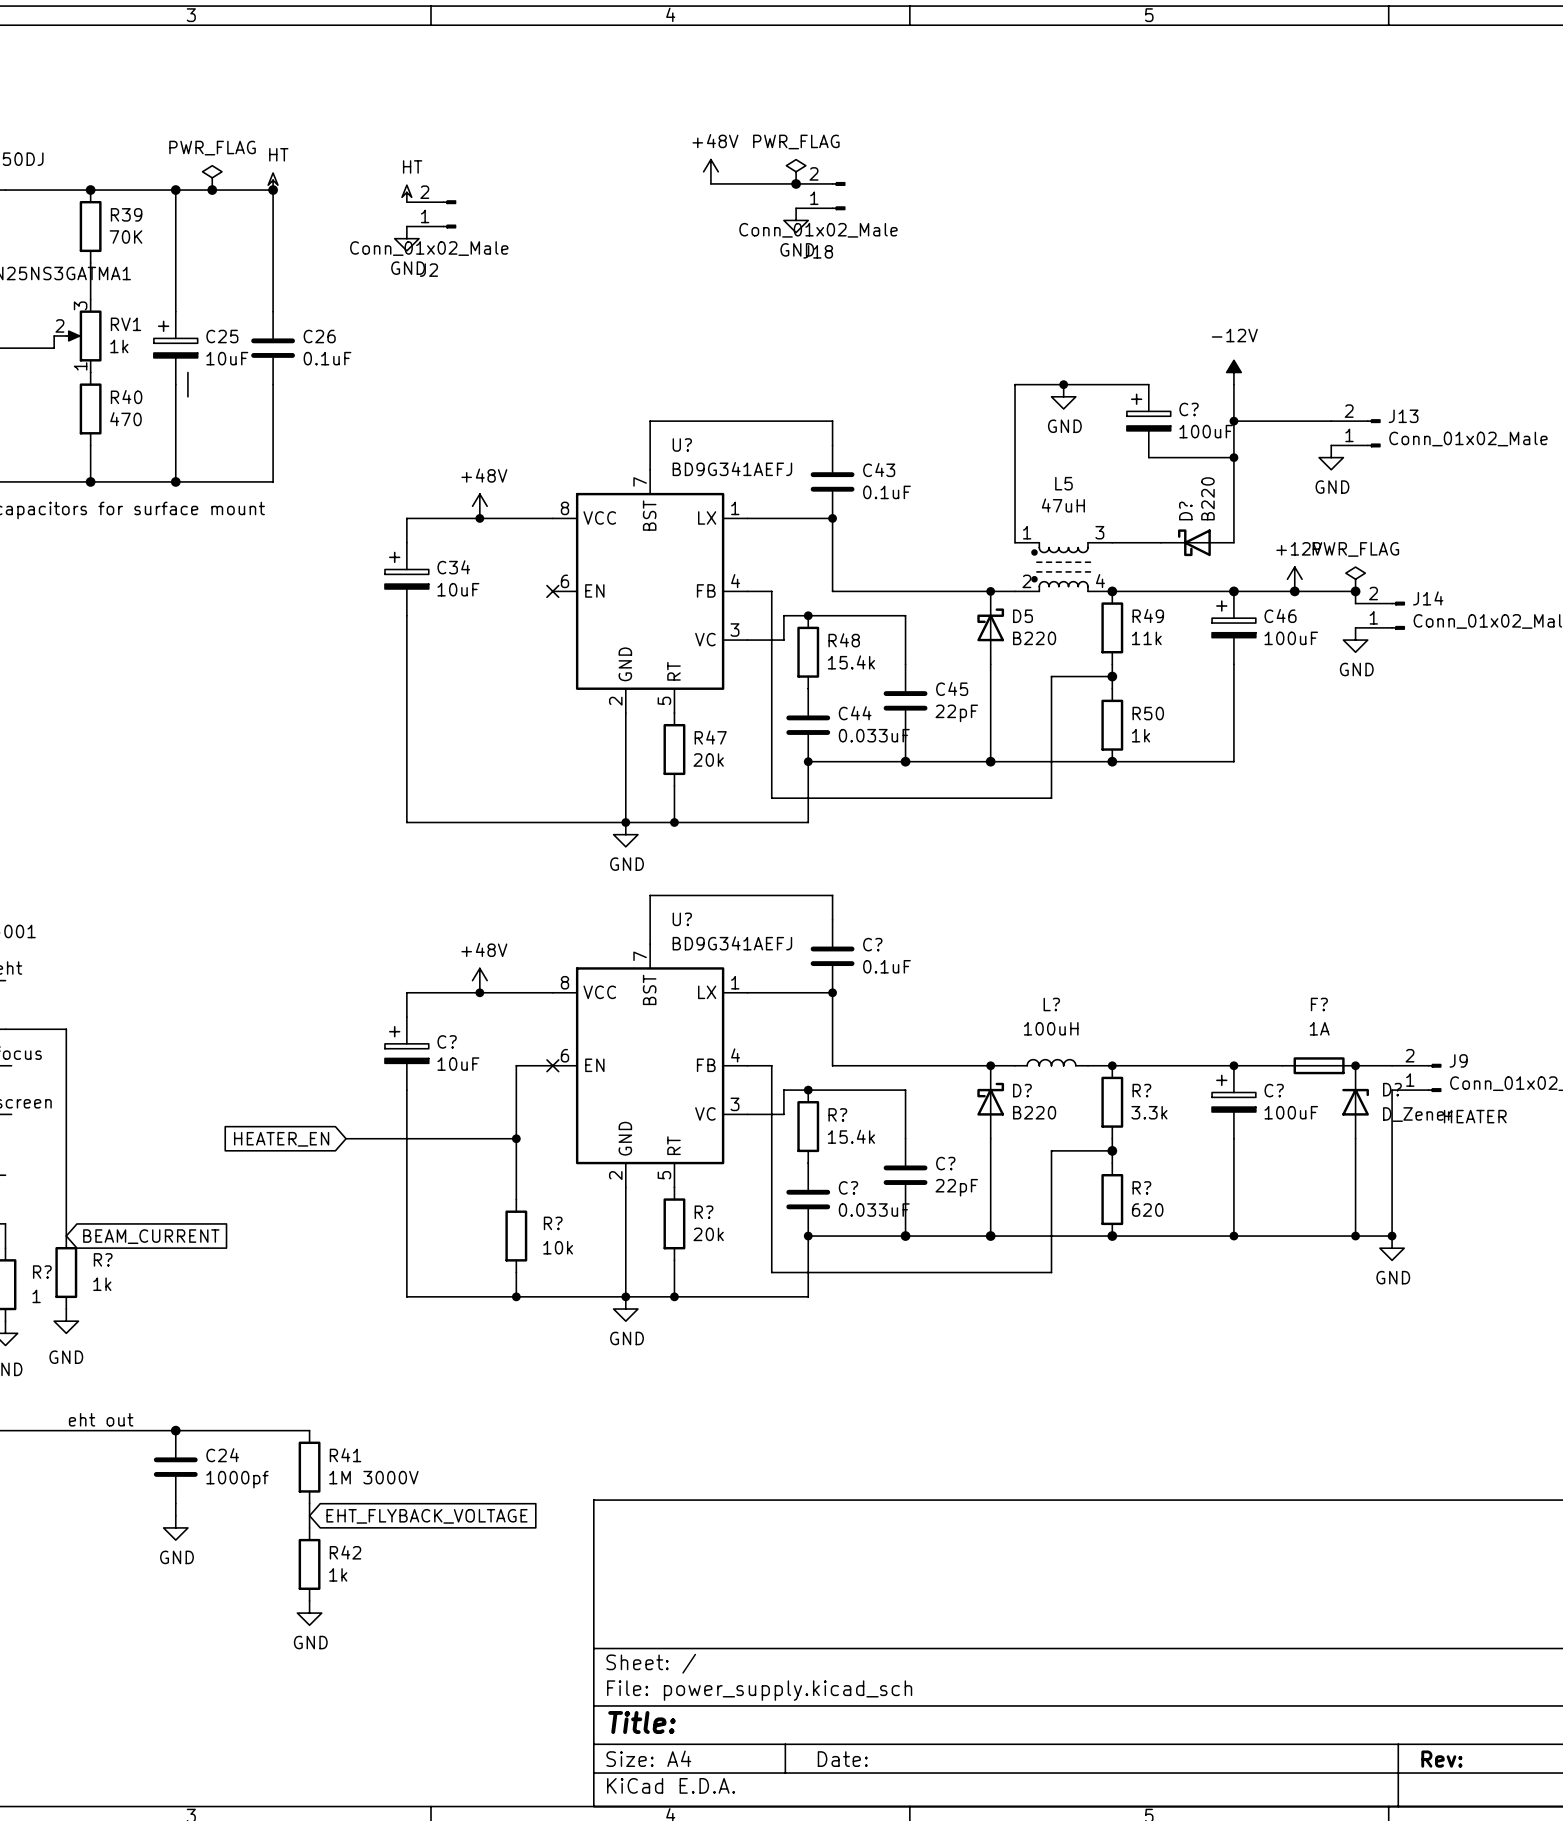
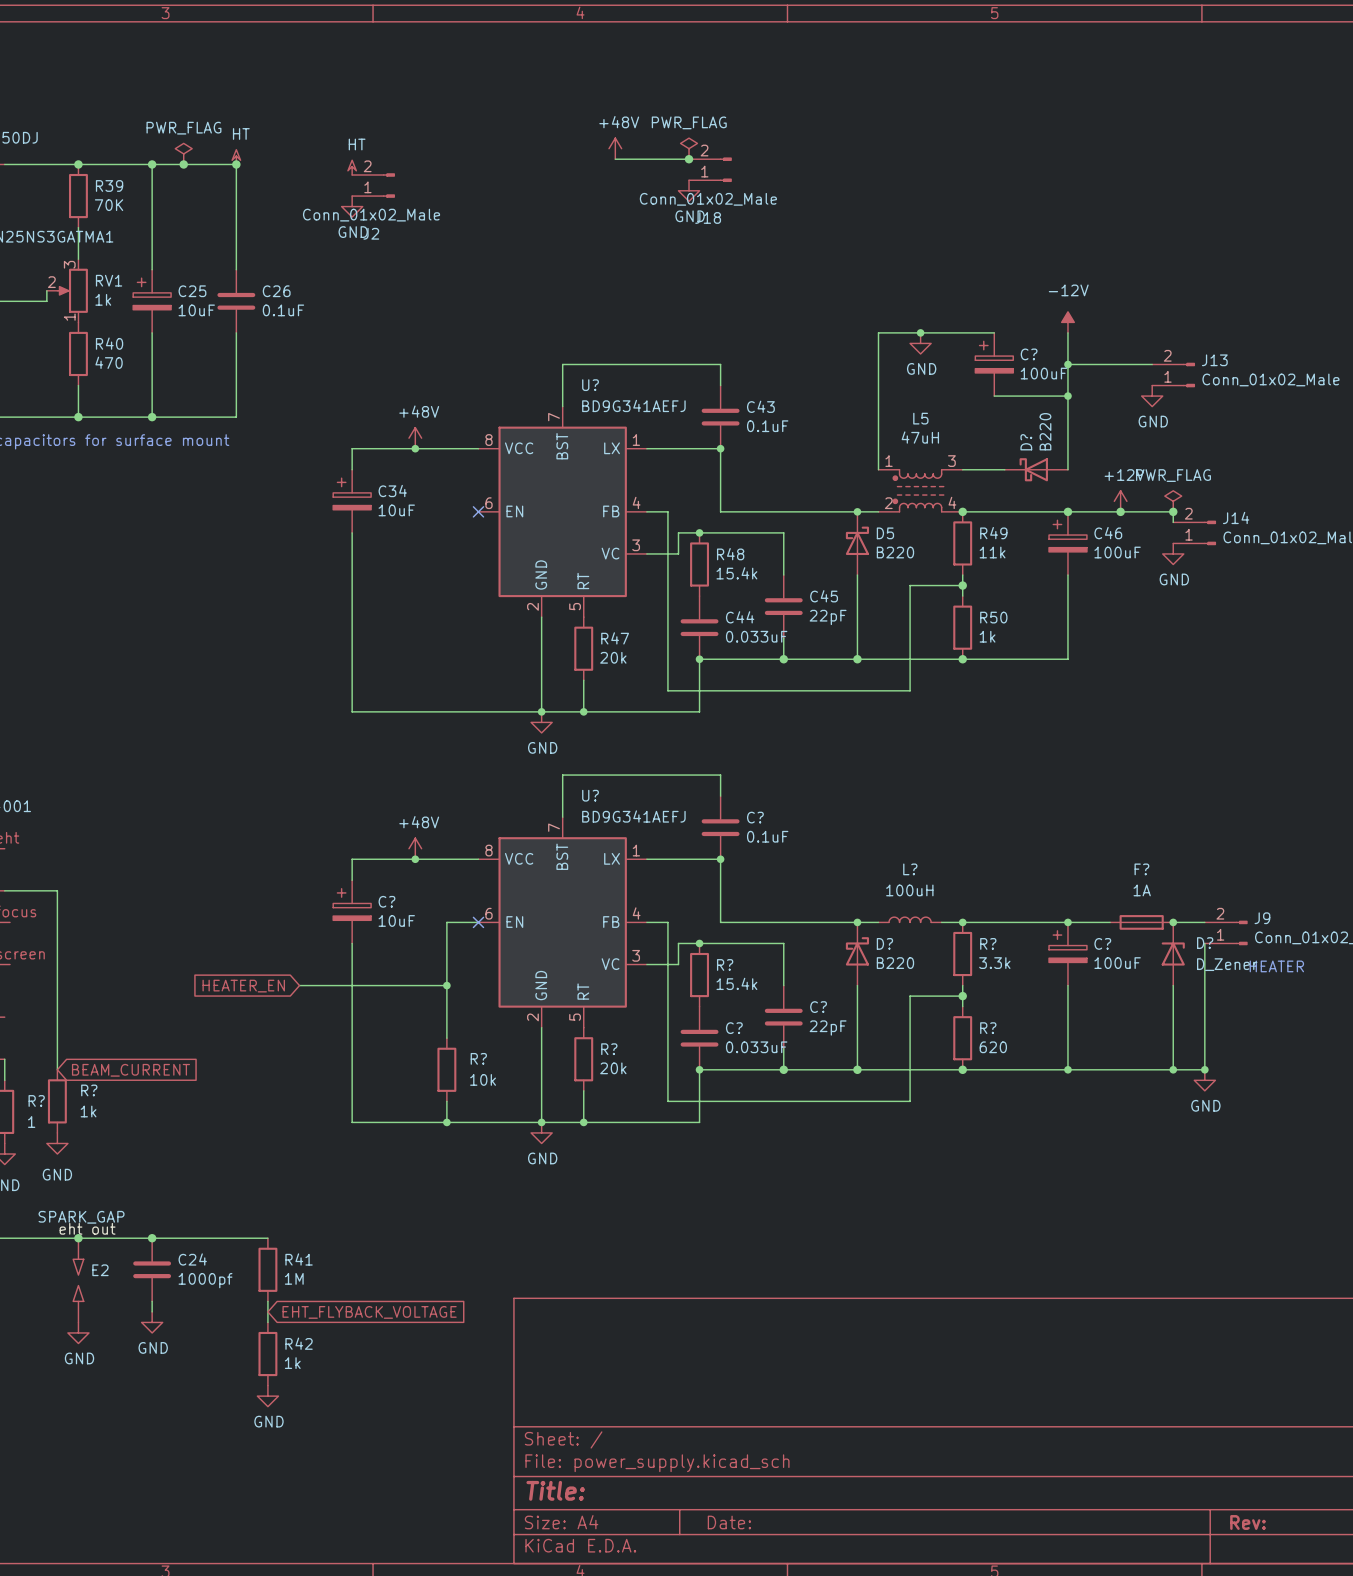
wire: (187, 372) (187, 396) -> none
junction: none -> (78, 1238)
R41 value: 1M 3000V (373, 1477) -> 1M (294, 1278)
E2: none -> SPARK_GAP (78, 1280)
power symbol: none -> GND (78, 1332)

